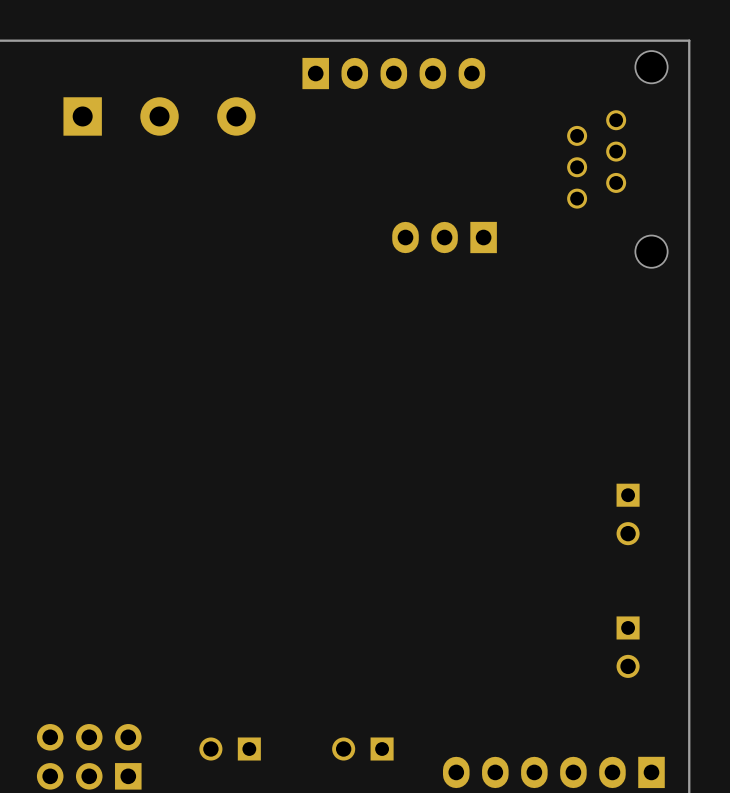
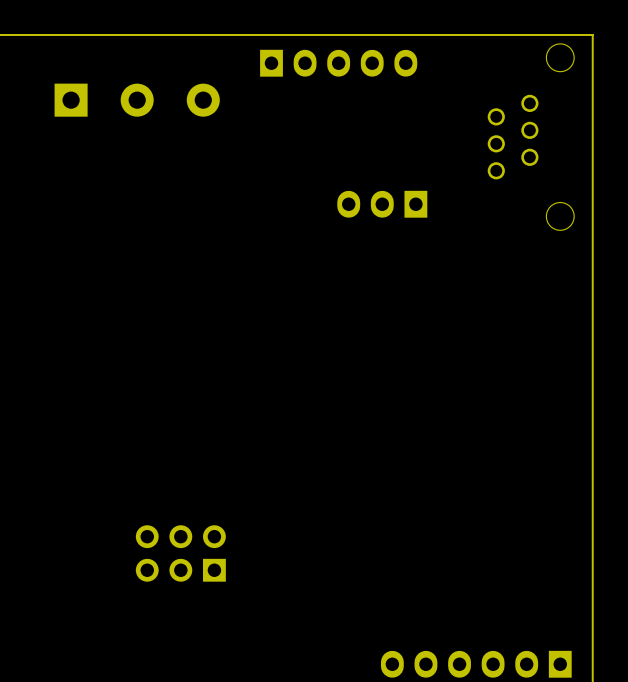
part: (628, 514) -> none
part: (628, 647) -> none
part: (230, 749) -> none
part: (362, 749) -> none
part position: (89, 756) -> (180, 553)

